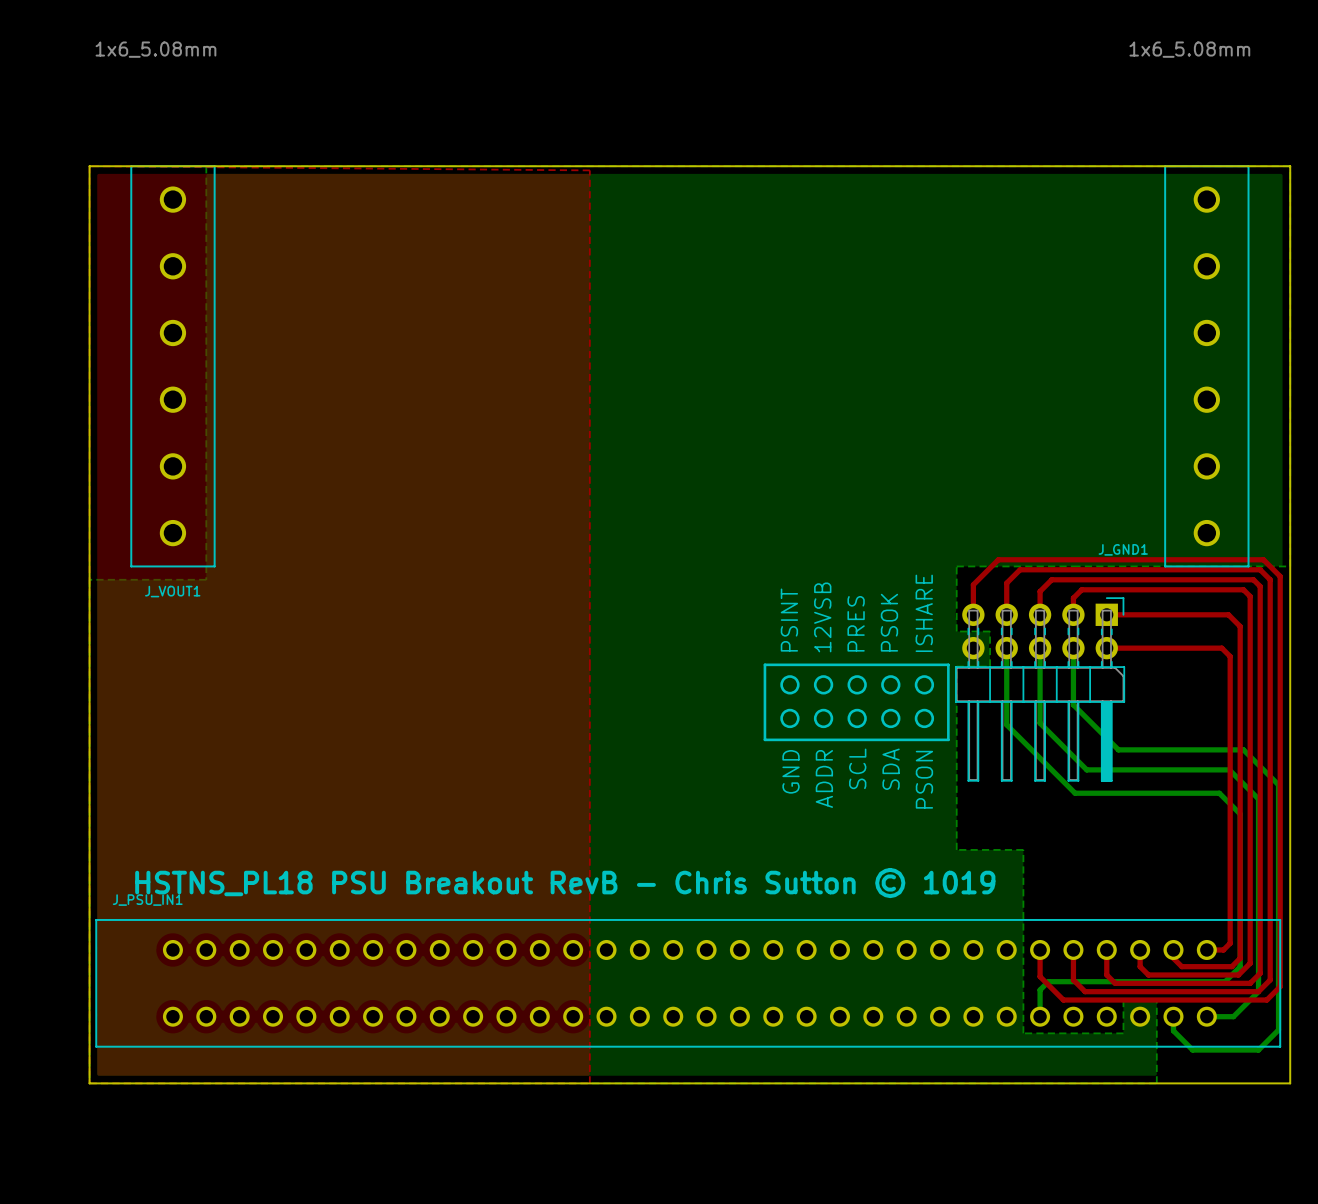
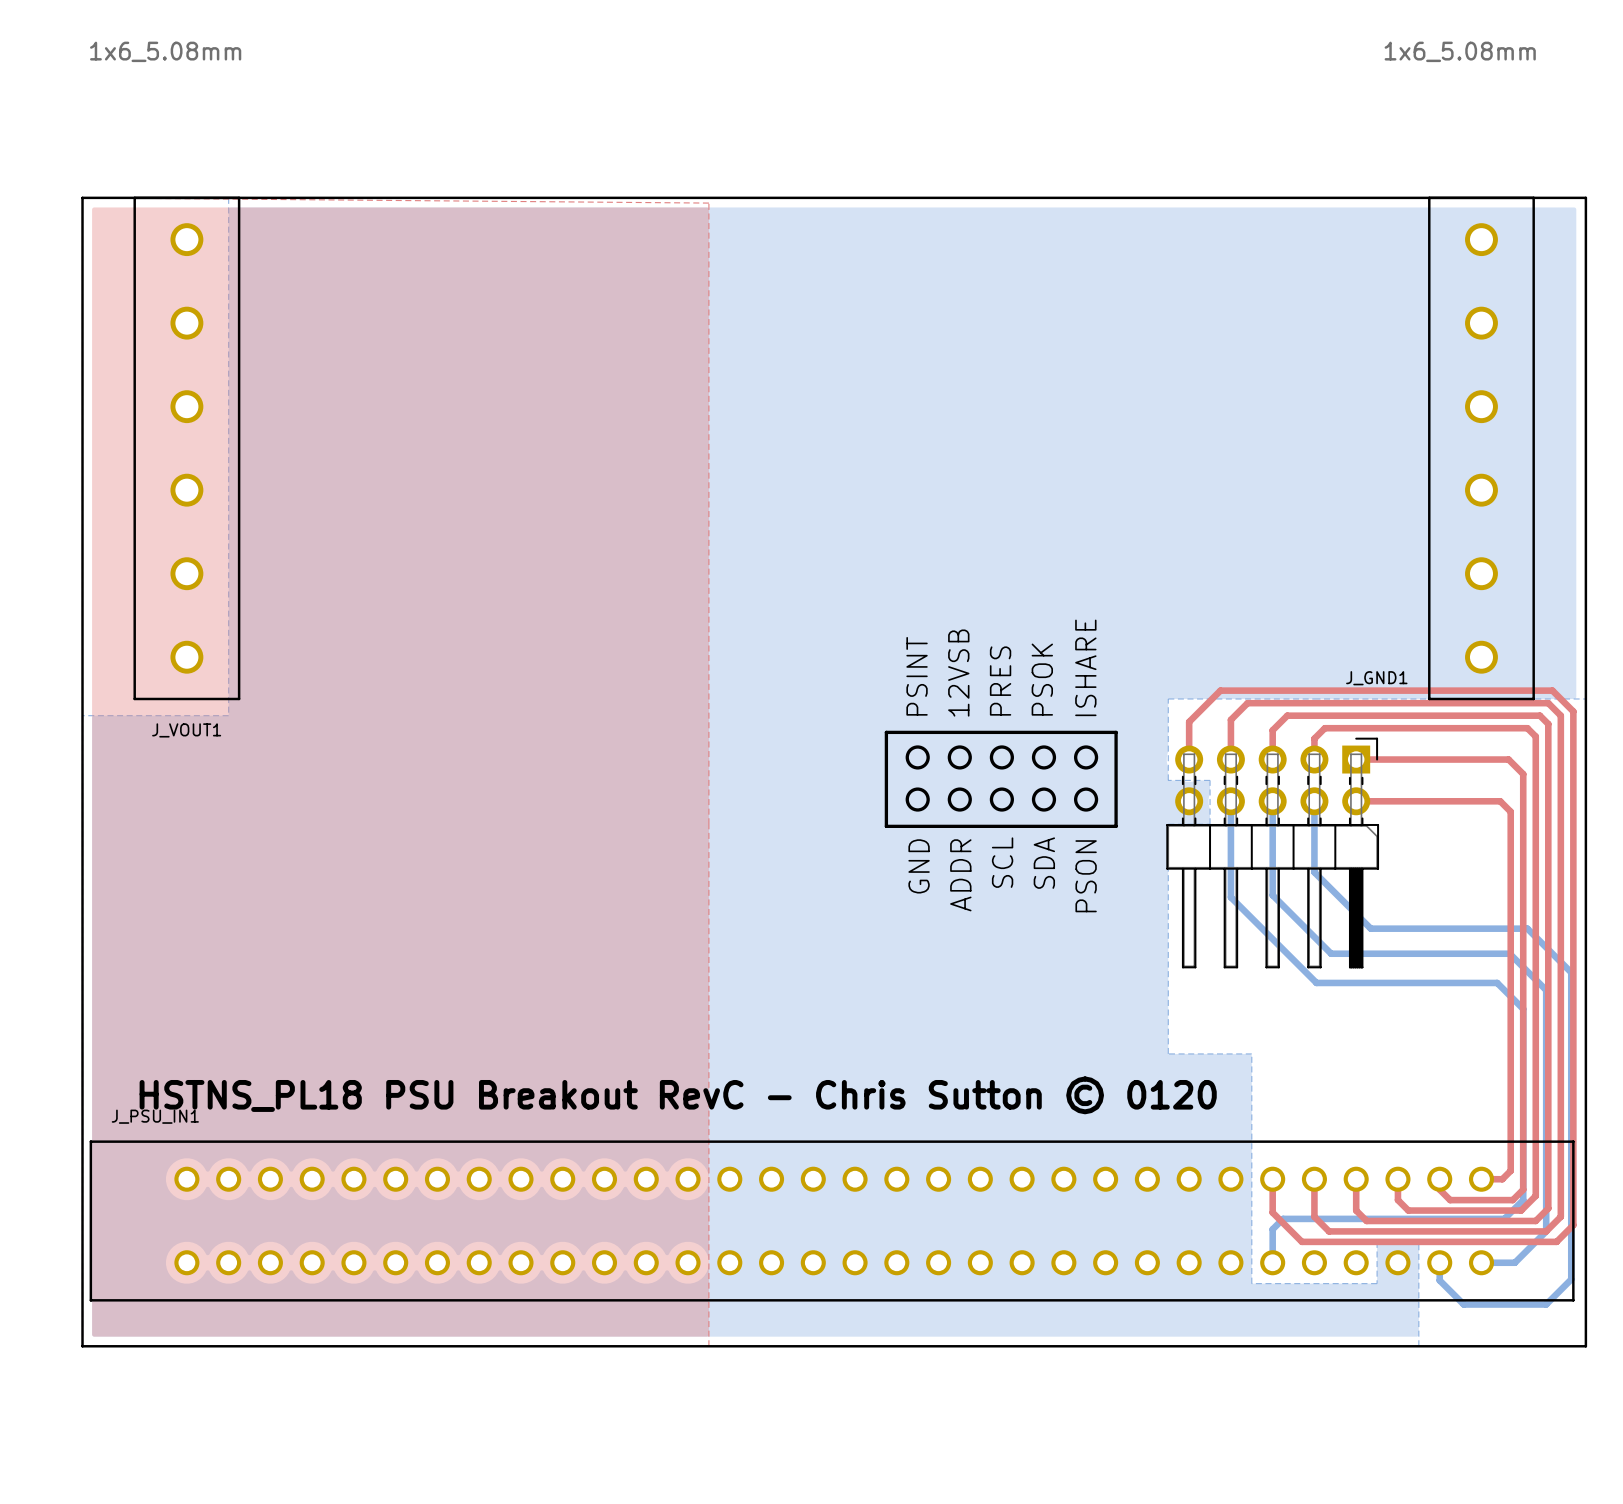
drawing: none -> [905, 745, 1099, 812]
text position: ISHARE (924, 613) -> ISHARE (1085, 667)
text position: 12VSB (822, 617) -> 12VSB (958, 673)
text position: PSINT (789, 620) -> PSINT (917, 676)
text position: PSOK (889, 622) -> PSOK (1042, 679)
text position: PRES (856, 623) -> PRES (1000, 681)
line: (764, 664) (764, 739) (948, 739) (948, 664) (764, 664) -> (886, 732) (886, 826) (1116, 826) (1116, 732) (886, 732)
drawing: [780, 675, 935, 729] -> none
text position: SCL (857, 768) -> SCL (1002, 862)
text position: SDA (891, 769) -> SDA (1044, 863)
text position: GND (791, 771) -> GND (919, 866)
text position: ADDR (824, 778) -> ADDR (960, 875)
text position: PSON (924, 779) -> PSON (1086, 876)
text: HSTNS_PL18 PSU Breakout RevB - Chris Sutton © 1019 (565, 883) -> HSTNS_PL18 PSU Breakout RevC - Chris Sutton © 0120 (678, 1095)

